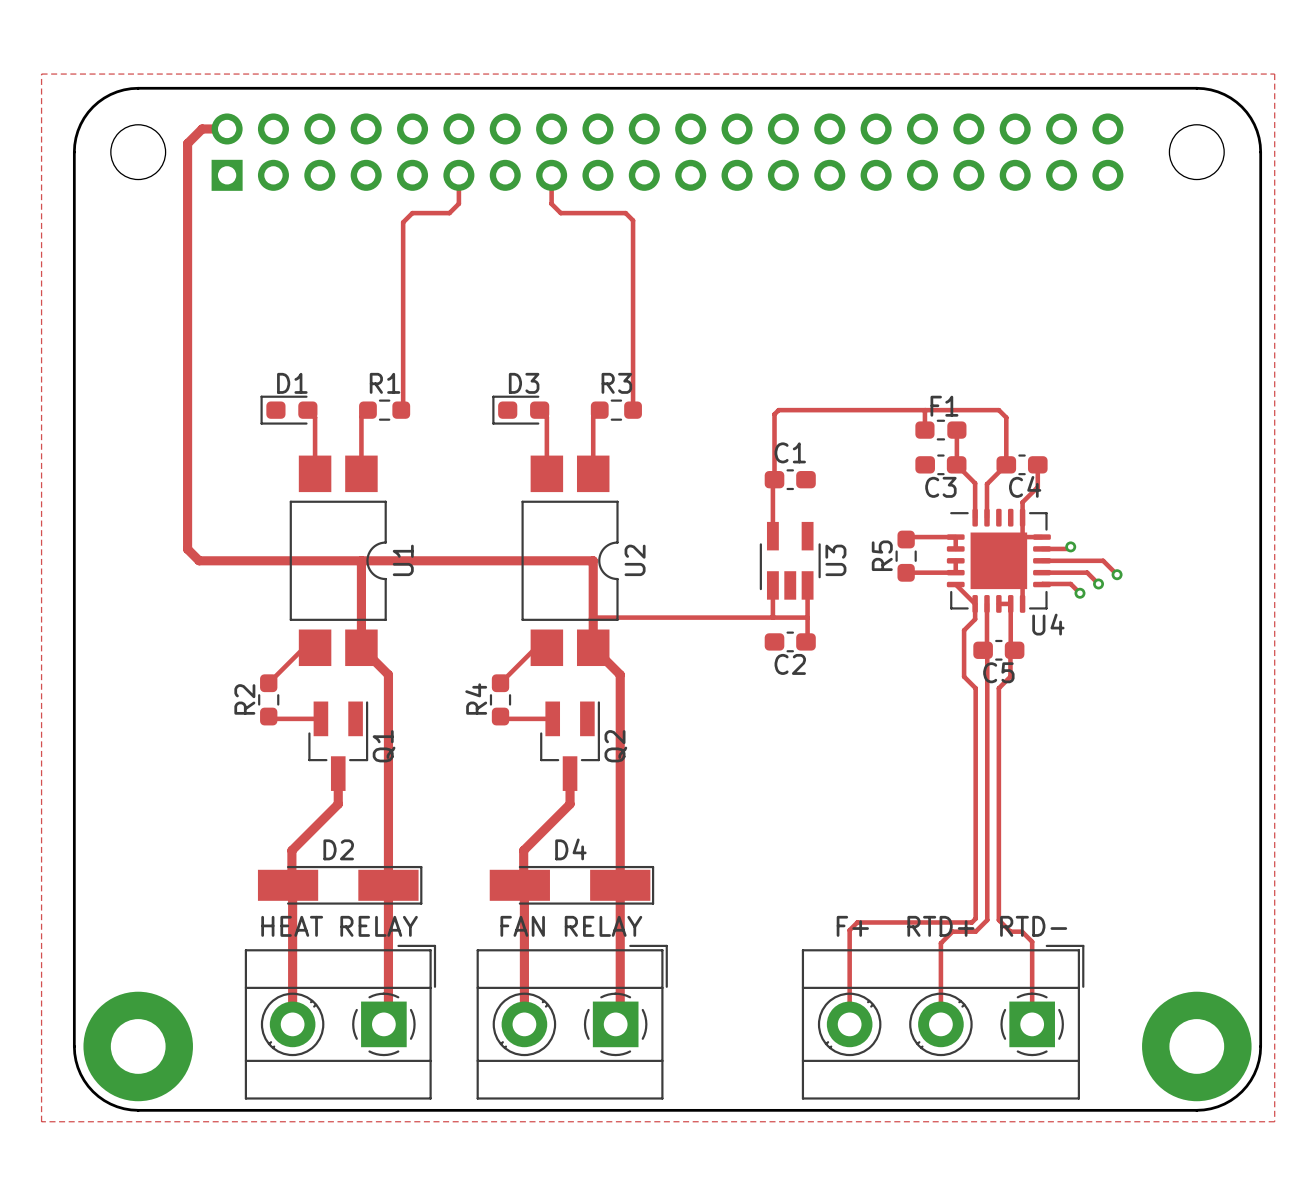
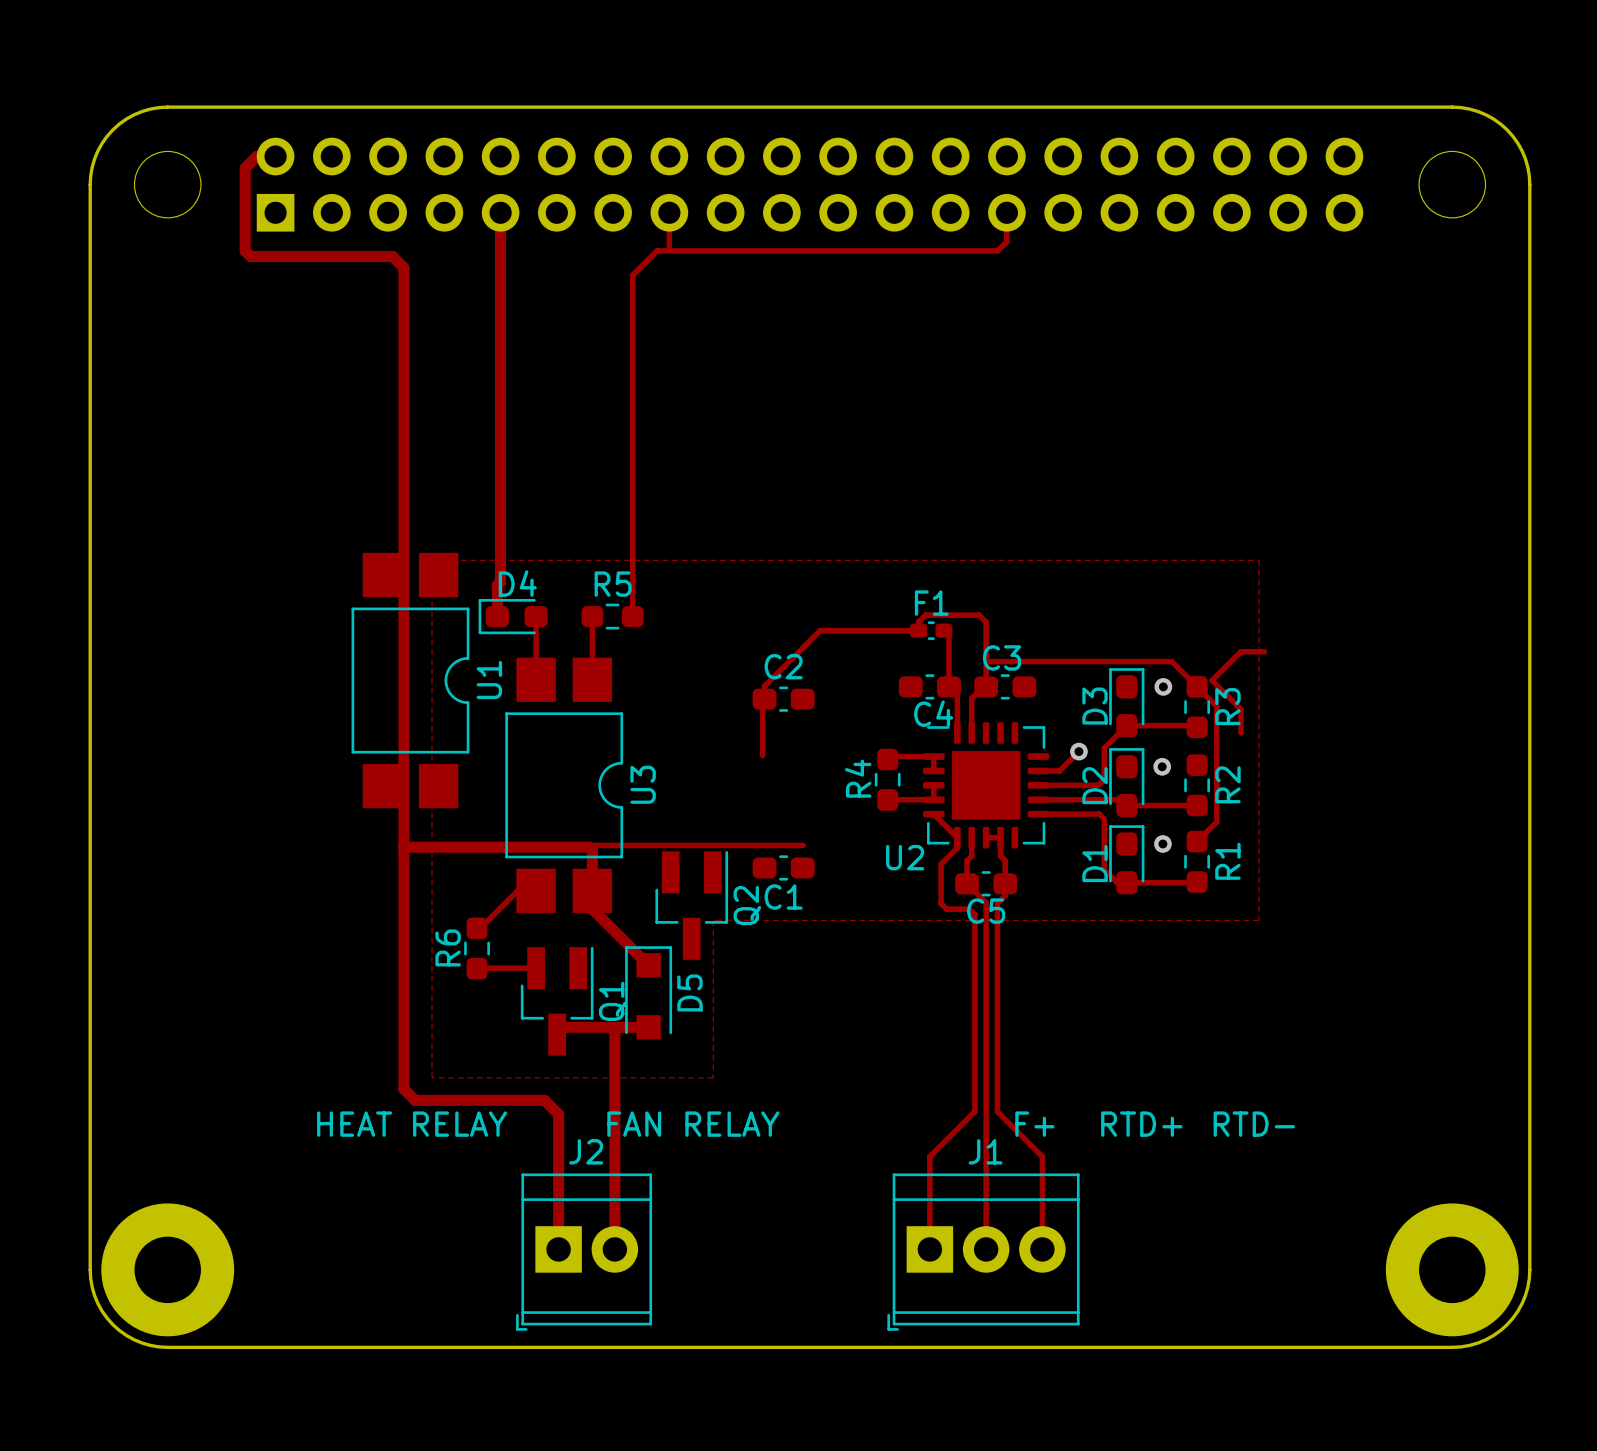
zone outline: (41, 74) (41, 1121) (1274, 1121) (1274, 74) (41, 74) -> none
track: (227, 128) (202, 128) (187, 143) (187, 549) (199, 560) (593, 560) (593, 647) (620, 674) (620, 1019) (615, 1024) -> (275, 156) (256, 156) (245, 168) (245, 251) (250, 256) (392, 256) (403, 267) (403, 1089) (415, 1100) (544, 1100) (558, 1114) (558, 1249)
track: none -> (500, 212) (500, 582) (497, 585) (497, 616) (502, 611)
track: (458, 175) (458, 203) (449, 213) (412, 213) (403, 222) (403, 408) (401, 410) -> none
track: none -> (1006, 212) (1006, 241) (997, 250) (657, 250) (632, 275) (632, 616)
track: (551, 203) (560, 213) (625, 213) (633, 220) (633, 410) -> none
D1 name position: D1 (292, 383) -> D1 (1095, 863)
D3 name position: D3 (524, 383) -> D3 (1095, 706)
D1 rotation: 0° (288, 410) -> 90° clockwise (1126, 859)
D1 position: (288, 410) -> (1126, 859)
track: (307, 410) (315, 417) (315, 473) -> none
track: (367, 410) (361, 416) (361, 473) -> none
R1 rotation: 0° (384, 410) -> 90° clockwise (1197, 861)
R1 position: (384, 410) -> (1197, 861)
D3 rotation: 0° (520, 410) -> 90° clockwise (1126, 702)
D3 position: (520, 410) -> (1126, 702)
track: (539, 410) (546, 417) (546, 473) -> none
track: (599, 410) (593, 416) (593, 473) -> none
R3 rotation: 0° (616, 410) -> 90° clockwise (1197, 707)
R3 position: (616, 410) -> (1197, 707)
track: (925, 410) (924, 430) -> none
F1 footprint: [915, 419, 967, 441] -> [910, 621, 953, 640]
track: (956, 430) (956, 464) -> none
C1 name position: C1 (790, 452) -> C1 (783, 897)
U2 footprint: [521, 455, 619, 667] -> [923, 722, 1050, 849]
zone outline: none -> (432, 560) (432, 1077) (713, 1077) (713, 920) (1258, 920) (1258, 560) (432, 560)
C3 position: (940, 464) -> (1005, 686)
track: (956, 464) (975, 483) (975, 517) -> none
C4 position: (1022, 464) -> (929, 686)
track: (1041, 469) (1037, 464) (1037, 487) (1022, 502) (1022, 537) -> none
C1 position: (790, 479) -> (783, 867)
C3 name position: C3 (940, 487) -> C3 (1002, 657)
track: none -> (536, 616) (536, 679)
track: none -> (592, 616) (592, 679)
track: (987, 517) (987, 484) (1006, 464) (1006, 417) (998, 410) (778, 410) (774, 414) (772, 536) -> none
track: none -> (943, 630) (948, 635) (948, 686)
U3 footprint: [759, 521, 821, 600] -> [505, 657, 624, 914]
track: (906, 539) (908, 537) (955, 537) (955, 548) -> none
track: none -> (986, 661) (1171, 661) (1216, 706) (1216, 821) (1197, 841)
track: (1070, 546) (1068, 548) (1041, 548) -> none
via: (1070, 546) -> none
R5 rotation: 0° (906, 556) -> 90° clockwise (612, 616)
R5 position: (906, 556) -> (612, 616)
track: (361, 560) (361, 647) (388, 674) (388, 1019) (383, 1024) -> none
U2 name position: U2 (635, 560) -> U2 (905, 857)
track: (955, 560) (955, 572) (906, 572) -> none
U4: (998, 560) -> none
track: (1041, 560) (1103, 560) (1117, 574) -> none
track: none -> (948, 686) (957, 695) (957, 733)
via: none -> (1163, 686)
track: (1041, 572) (1087, 572) (1098, 583) -> none
via: (1117, 574) -> none
via: (1098, 583) -> none
track: (955, 584) (975, 603) (975, 619) (964, 630) (964, 676) (975, 688) (975, 918) (971, 922) (857, 922) (849, 930) (849, 1024) -> none
track: (1041, 584) (1070, 583) (1079, 593) -> none
track: (772, 585) (772, 617) -> none
track: (807, 585) (807, 640) (805, 641) -> none
via: (1079, 593) -> none
track: none -> (1197, 727) (1195, 725) (1126, 725) (1104, 748) (1104, 779) (1098, 785) (1038, 785)
track: (987, 603) (987, 646) (983, 650) -> none
track: (998, 603) (1010, 603) (1010, 646) (1014, 650) (1010, 653) (1010, 676) (998, 688) (998, 920) (1010, 931) (1022, 931) (1032, 941) (1032, 1024) -> none
track: none -> (971, 733) (971, 698) (983, 686) (986, 686) (986, 622) (979, 615) (925, 615) (918, 622) (918, 630) (820, 630) (764, 686) (764, 699) (762, 701) (762, 755)
track: (807, 618) (593, 618) -> none
track: none -> (1078, 751) (1059, 770) (1038, 770)
via: none -> (1078, 751)
track: none -> (887, 759) (890, 756) (933, 756) (933, 770)
via: none -> (1162, 766)
C2 position: (790, 641) -> (783, 699)
track: (315, 647) (304, 647) (268, 683) -> none
track: (546, 647) (535, 647) (500, 683) -> none
track: none -> (933, 785) (933, 799) (887, 799)
track: (983, 650) (987, 654) (987, 920) (975, 931) (952, 931) (940, 943) (940, 1024) -> none
C5 position: (998, 650) -> (986, 883)
track: none -> (1038, 799) (1120, 799) (1126, 805) (1197, 805)
C2 name position: C2 (790, 664) -> C2 (783, 666)
track: none -> (933, 814) (957, 837) (957, 847) (941, 864) (941, 903) (946, 909) (969, 909) (974, 914) (974, 1111) (929, 1156) (929, 1249)
track: none -> (1038, 814) (1099, 814) (1104, 819) (1104, 869) (1117, 882) (1197, 882)
track: none -> (971, 837) (971, 855) (967, 860) (967, 883) (986, 902) (986, 1249)
track: none -> (986, 837) (1000, 837) (1000, 855) (1005, 860) (1005, 895) (997, 903) (997, 1111) (1042, 1156) (1042, 1249)
via: none -> (1162, 843)
track: none -> (803, 845) (591, 845) (589, 847)
track: none -> (403, 847) (589, 847)
track: none -> (589, 847) (592, 850) (592, 909) (648, 965)
R2 name position: R2 (244, 699) -> R2 (1227, 784)
R2 position: (268, 699) -> (1197, 785)
R4 position: (500, 699) -> (887, 779)
track: (268, 716) (271, 718) (320, 718) -> none
track: (500, 716) (502, 718) (552, 718) -> none
track: none -> (536, 890) (517, 890) (482, 925) (477, 928)
Q1 position: (338, 746) -> (557, 1001)
track: (338, 773) (338, 804) (291, 850) (291, 873) (288, 877) (288, 885) (292, 889) (292, 1024) -> none
track: (570, 773) (570, 804) (523, 850) (523, 873) (519, 877) (519, 885) (524, 889) (524, 1024) -> none
R6: none -> (477, 948)
track: none -> (536, 968) (477, 968)
D5: none -> (648, 992)
track: none -> (617, 1027) (614, 1030) (614, 1249)
track: none -> (648, 1027) (564, 1027) (557, 1034)
D2 name position: D2 (338, 849) -> D2 (1095, 785)
D2 footprint: [257, 865, 423, 905] -> [1109, 748, 1145, 818]
D4 footprint: [489, 865, 655, 905] -> [478, 598, 548, 635]
part: (340, 1022) -> none
part: (572, 1022) -> none
part: (943, 1022) -> none
J2: none -> (584, 1252)
J1: none -> (983, 1252)

